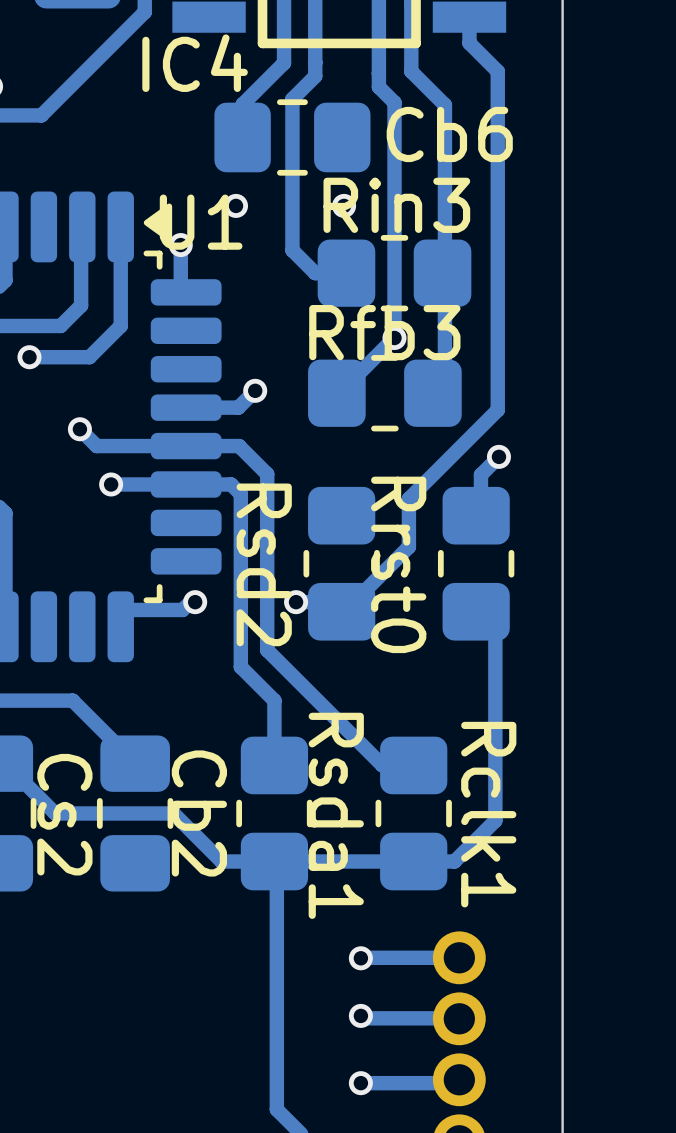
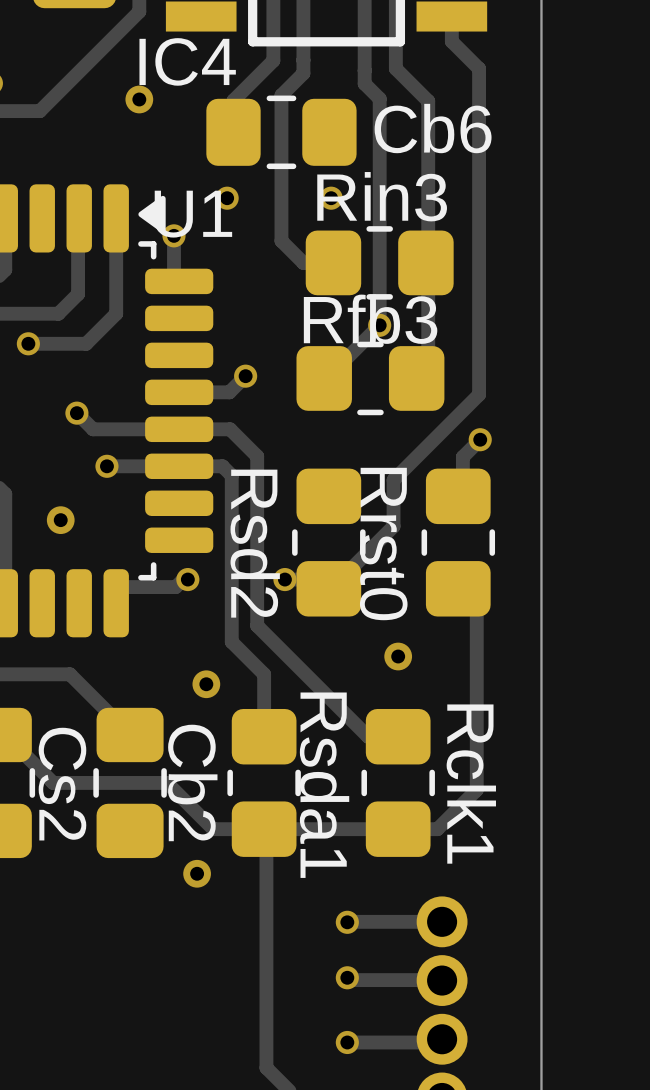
via: none -> (139, 99)
via: none -> (60, 520)
via: none -> (398, 656)
via: none -> (206, 684)
via: none -> (197, 873)

